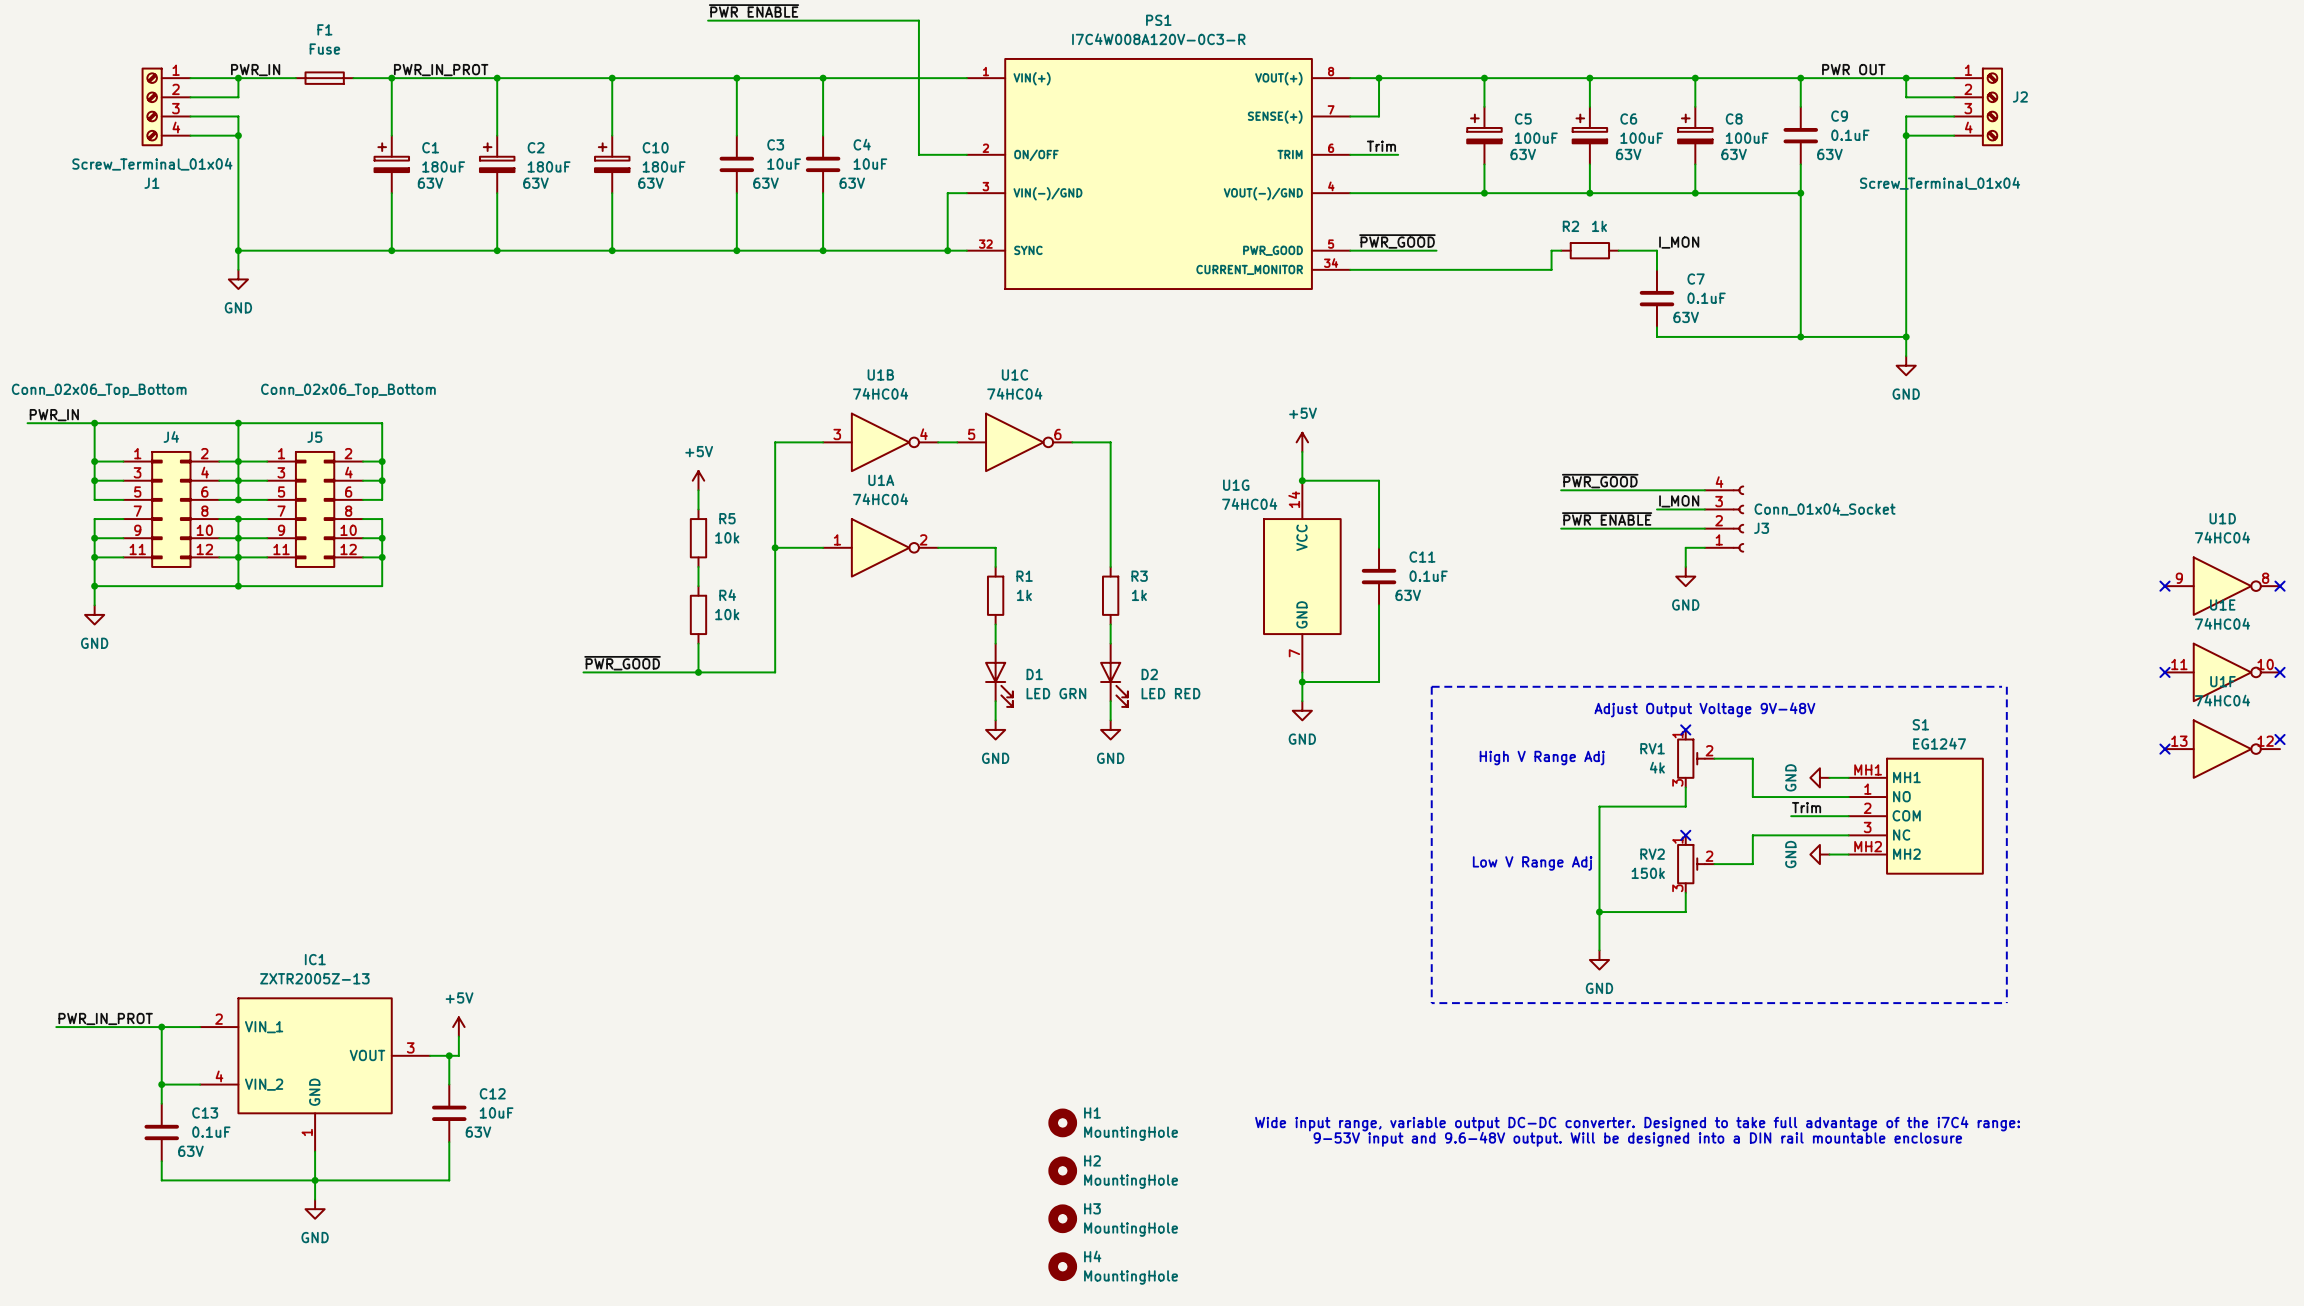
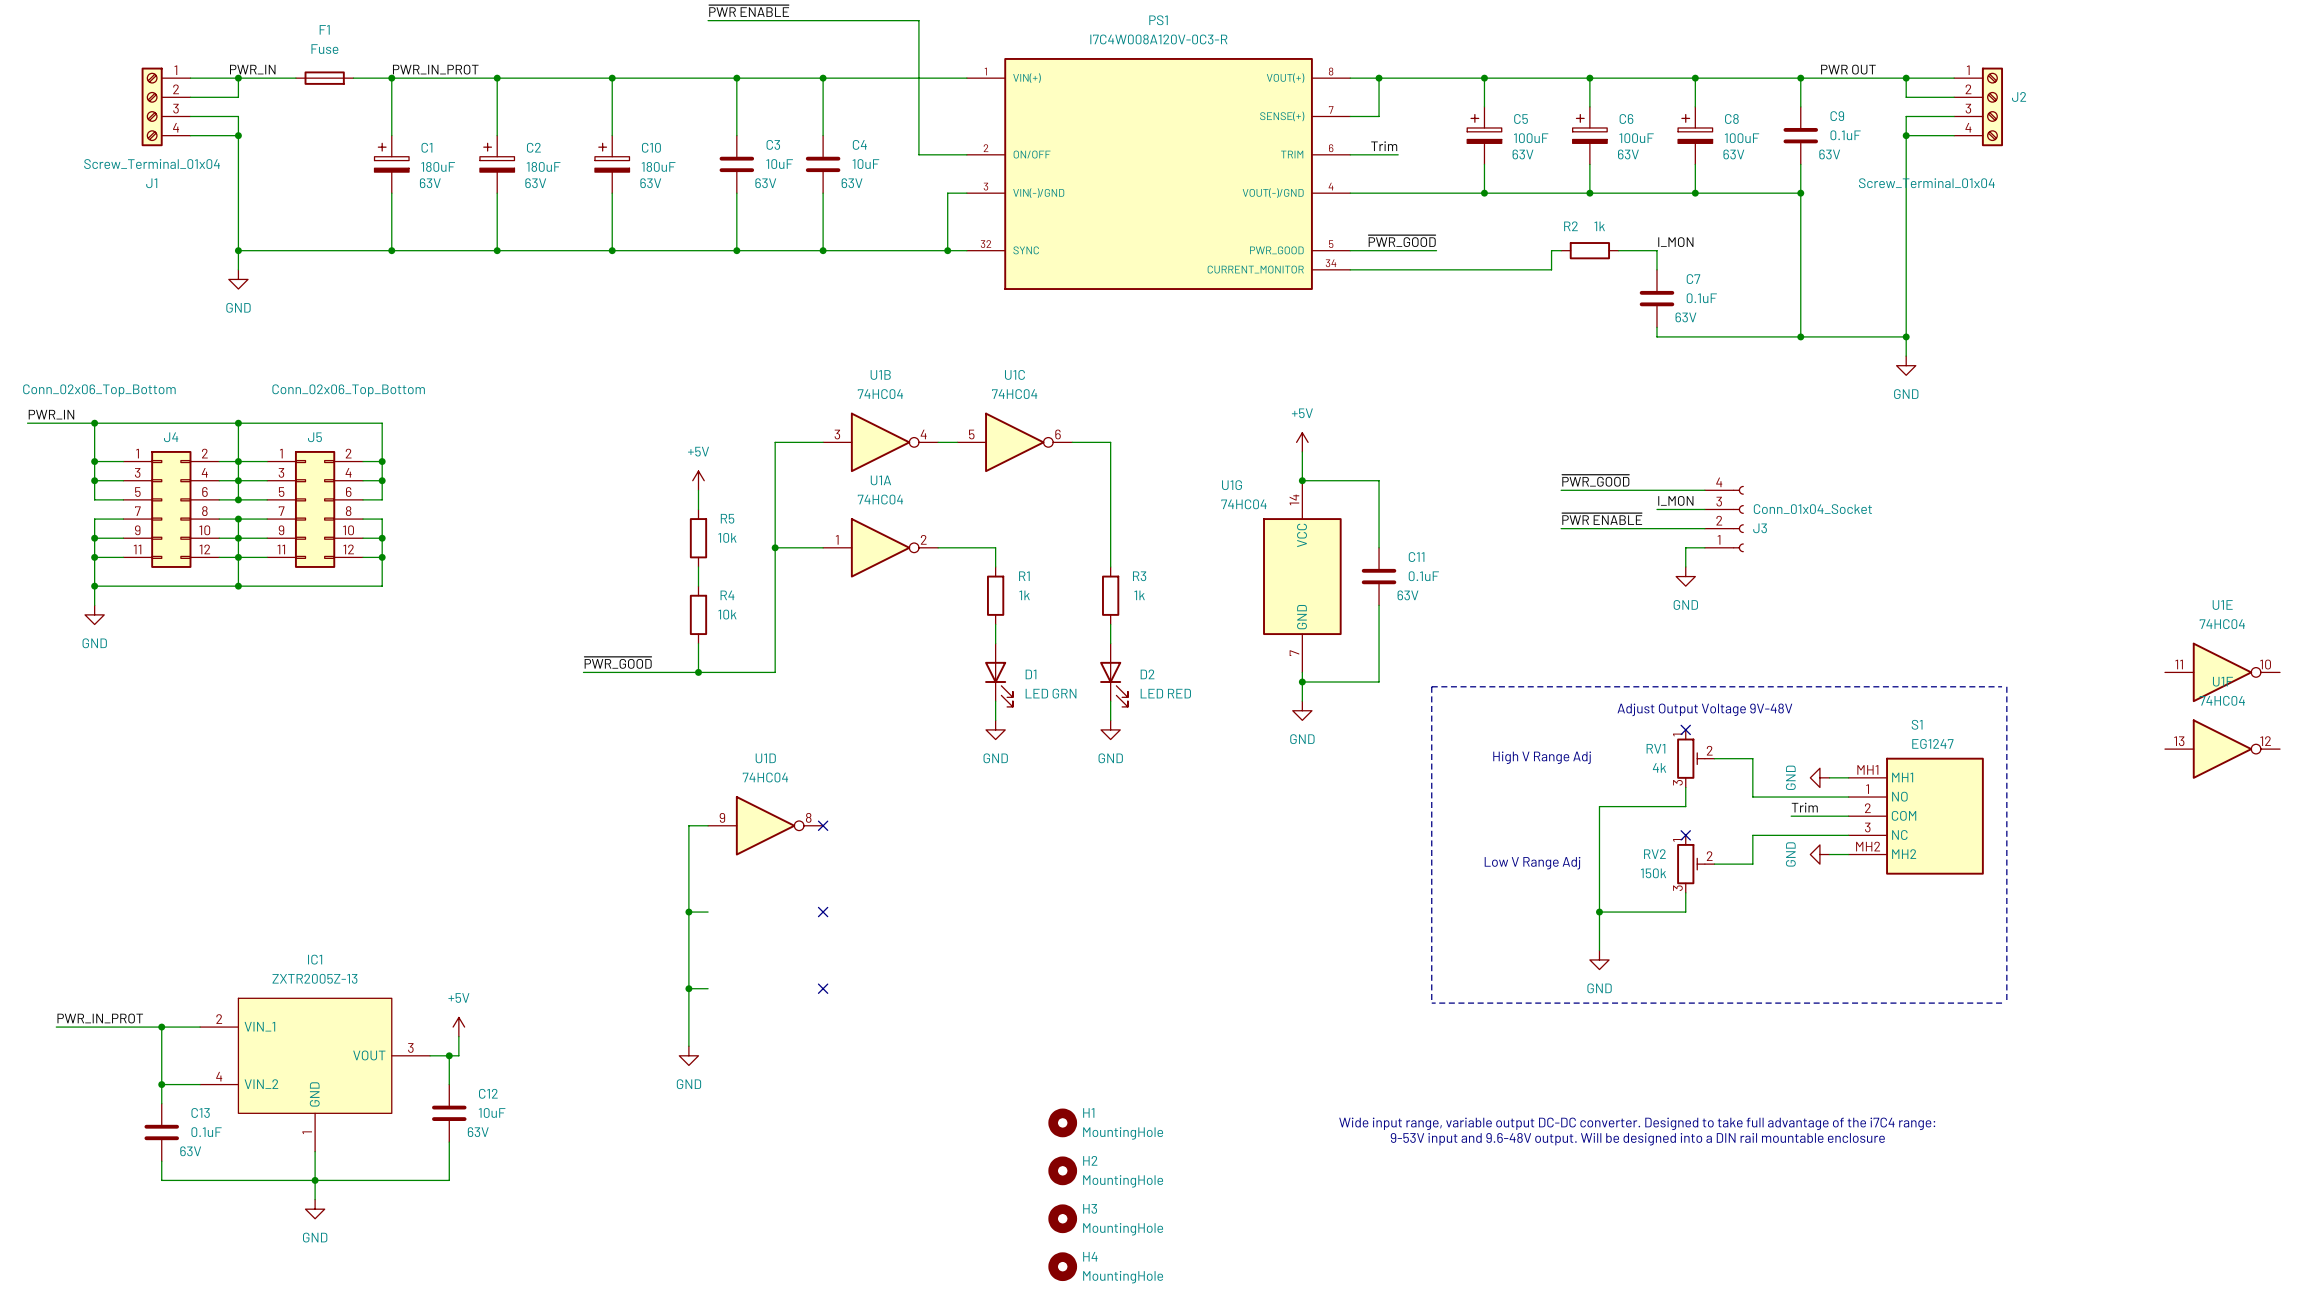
no-connect mark: (2164, 586) -> none
U1D position: (2222, 586) -> (765, 825)
no-connect mark: (2280, 586) -> none
no-connect mark: (2164, 672) -> none
no-connect mark: (2280, 672) -> none
no-connect mark: (2280, 739) -> none
no-connect mark: (2164, 749) -> none
wire: none -> (708, 825) (688, 825) (688, 1046)
no-connect mark: none -> (823, 825)
wire: none -> (688, 912) (708, 912)
junction: none -> (688, 912)
no-connect mark: none -> (823, 912)
wire: none -> (688, 988) (708, 988)
junction: none -> (688, 988)
no-connect mark: none -> (823, 988)
power symbol: none -> GND (688, 1055)

